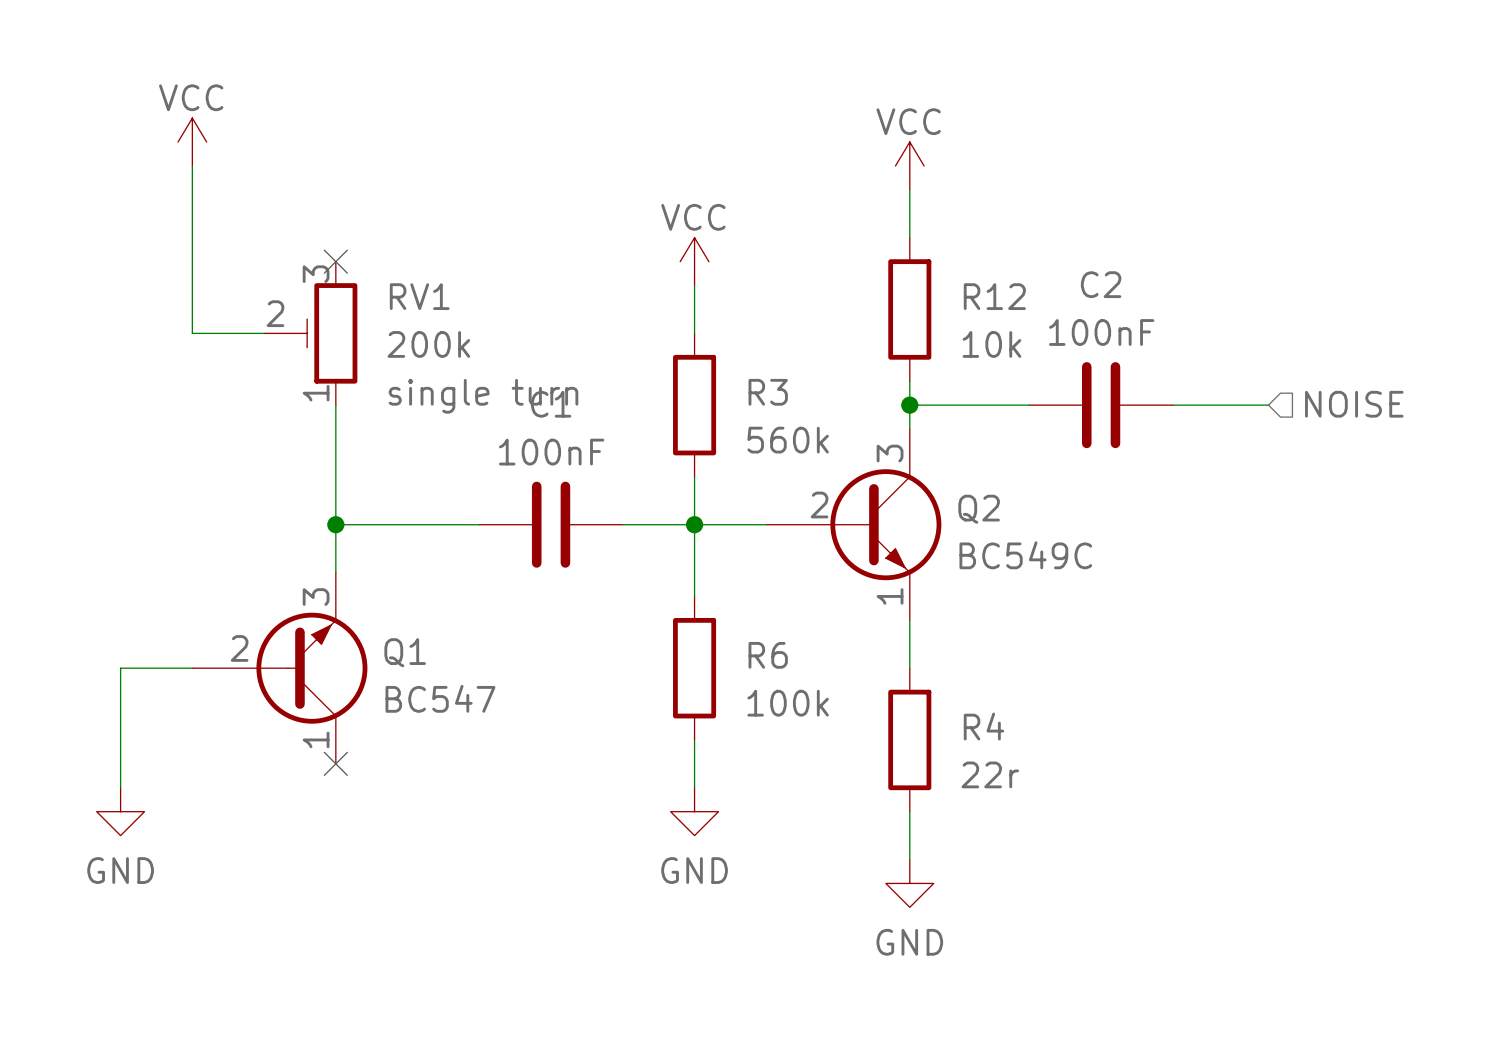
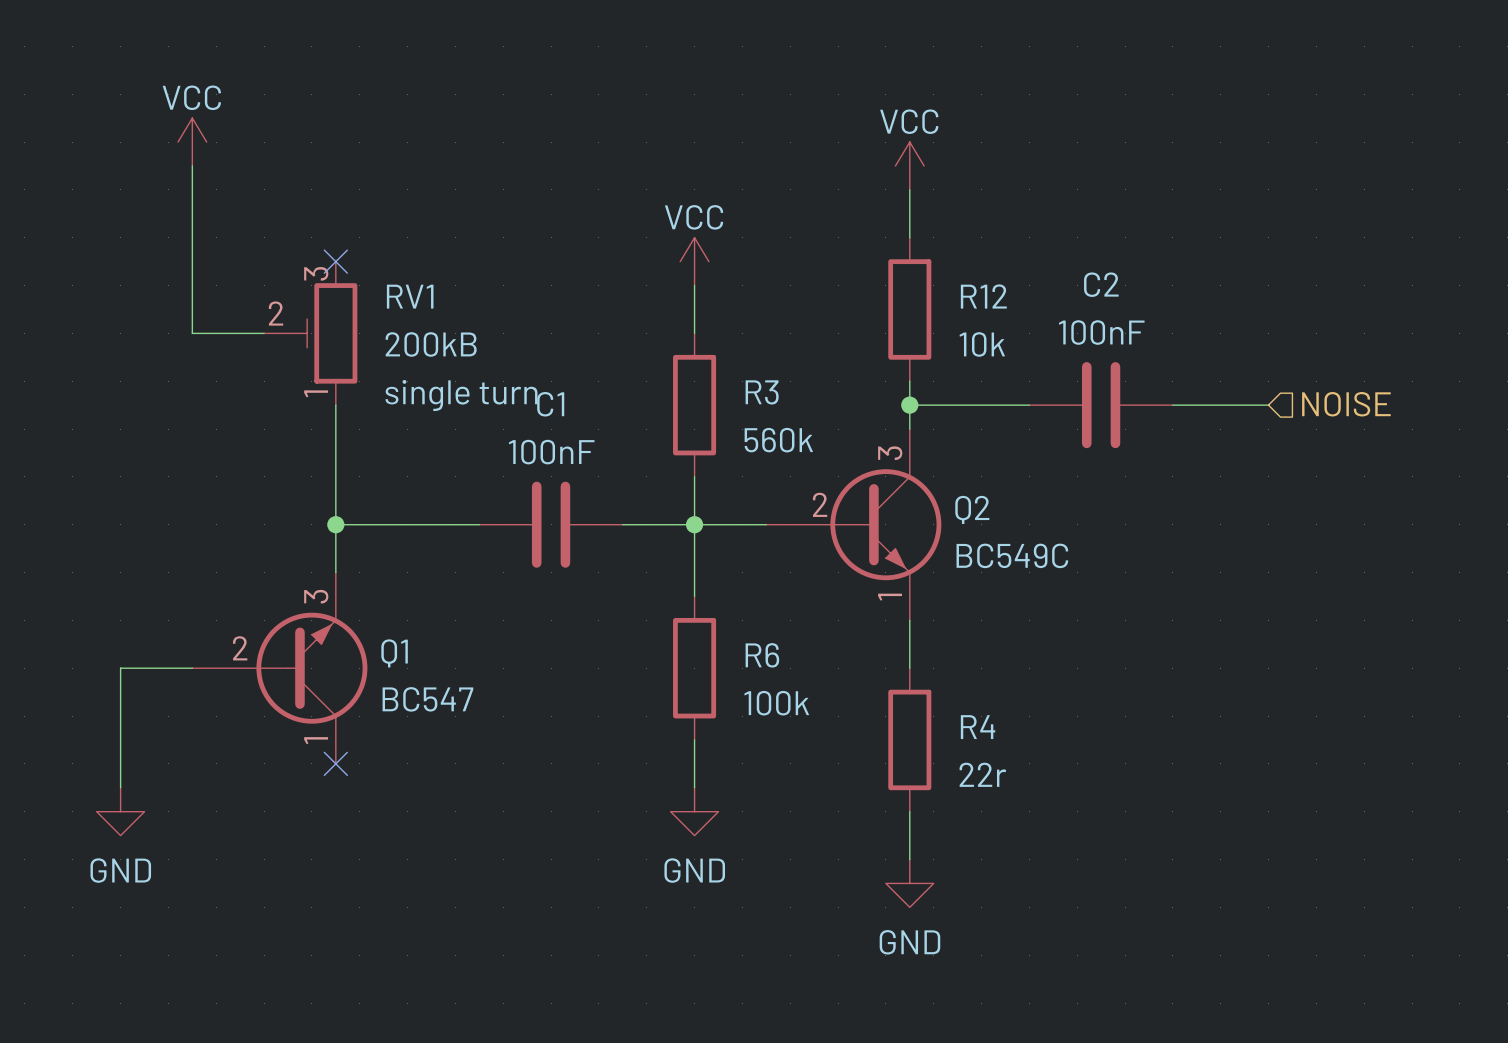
RV1 value: 200k (428, 344) -> 200kB (431, 344)

